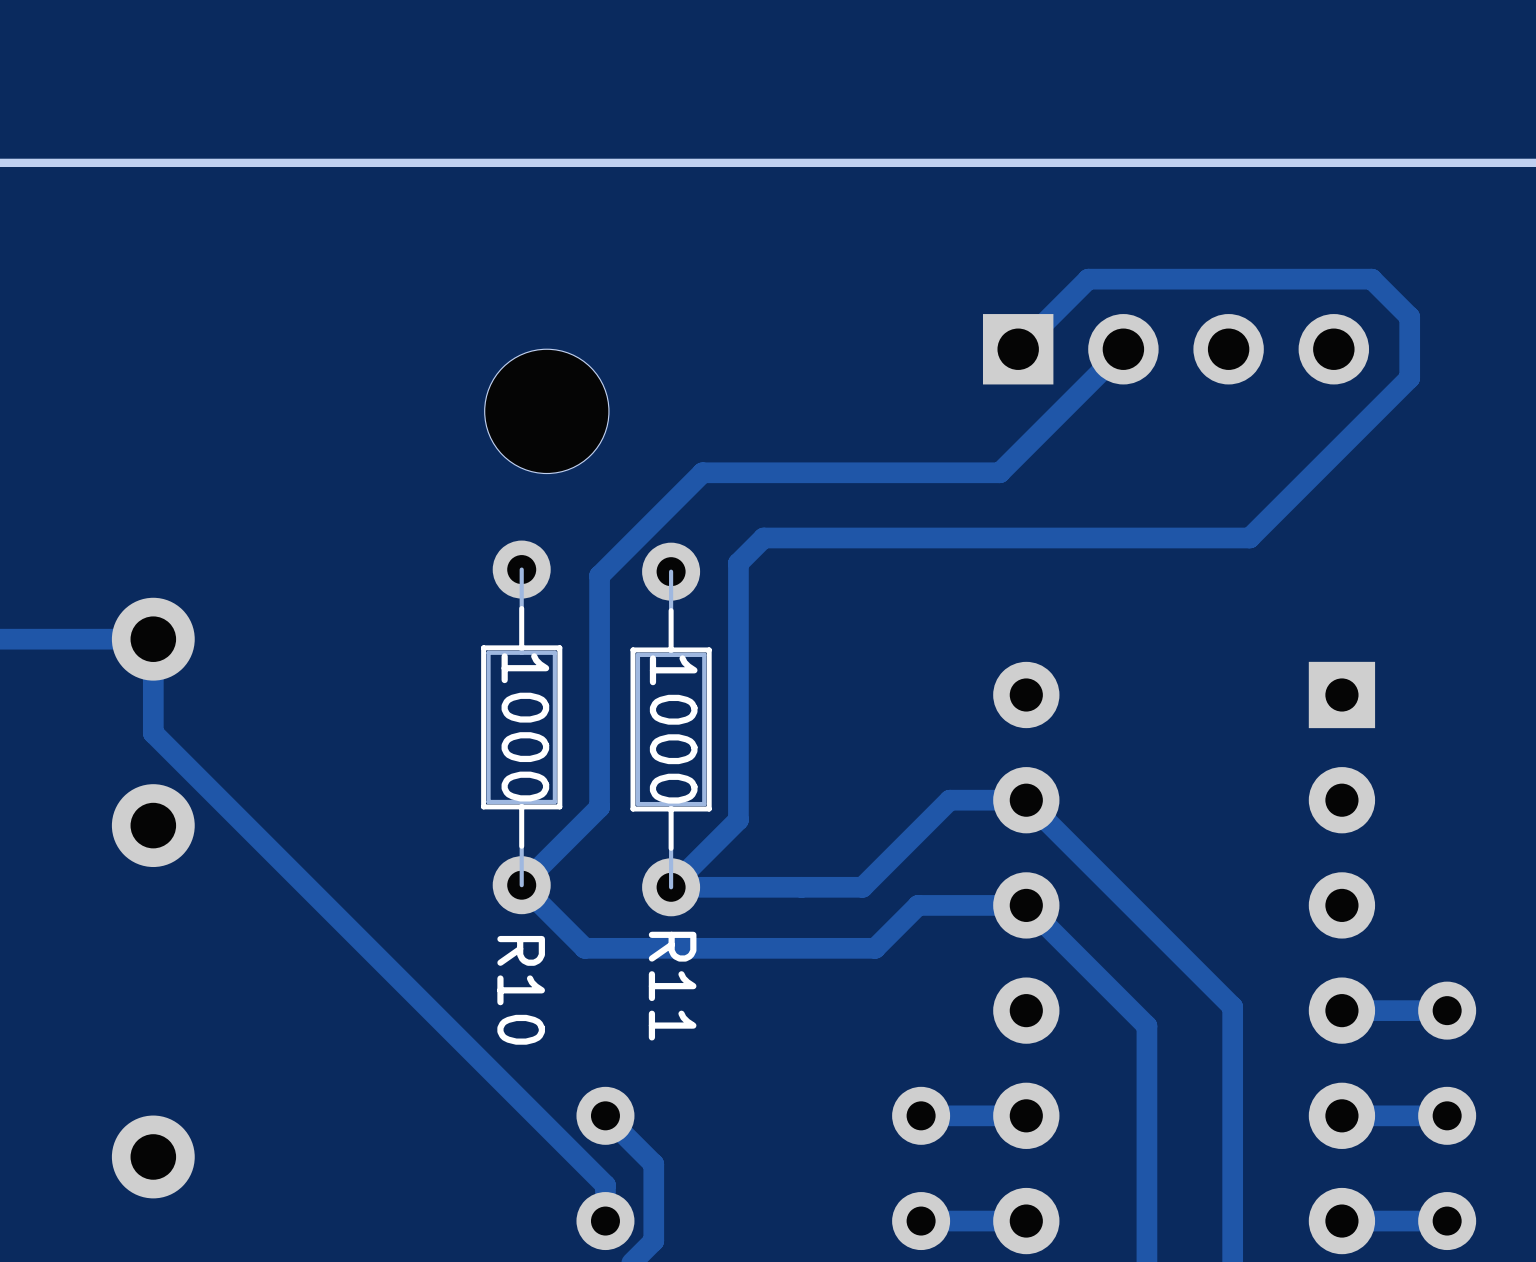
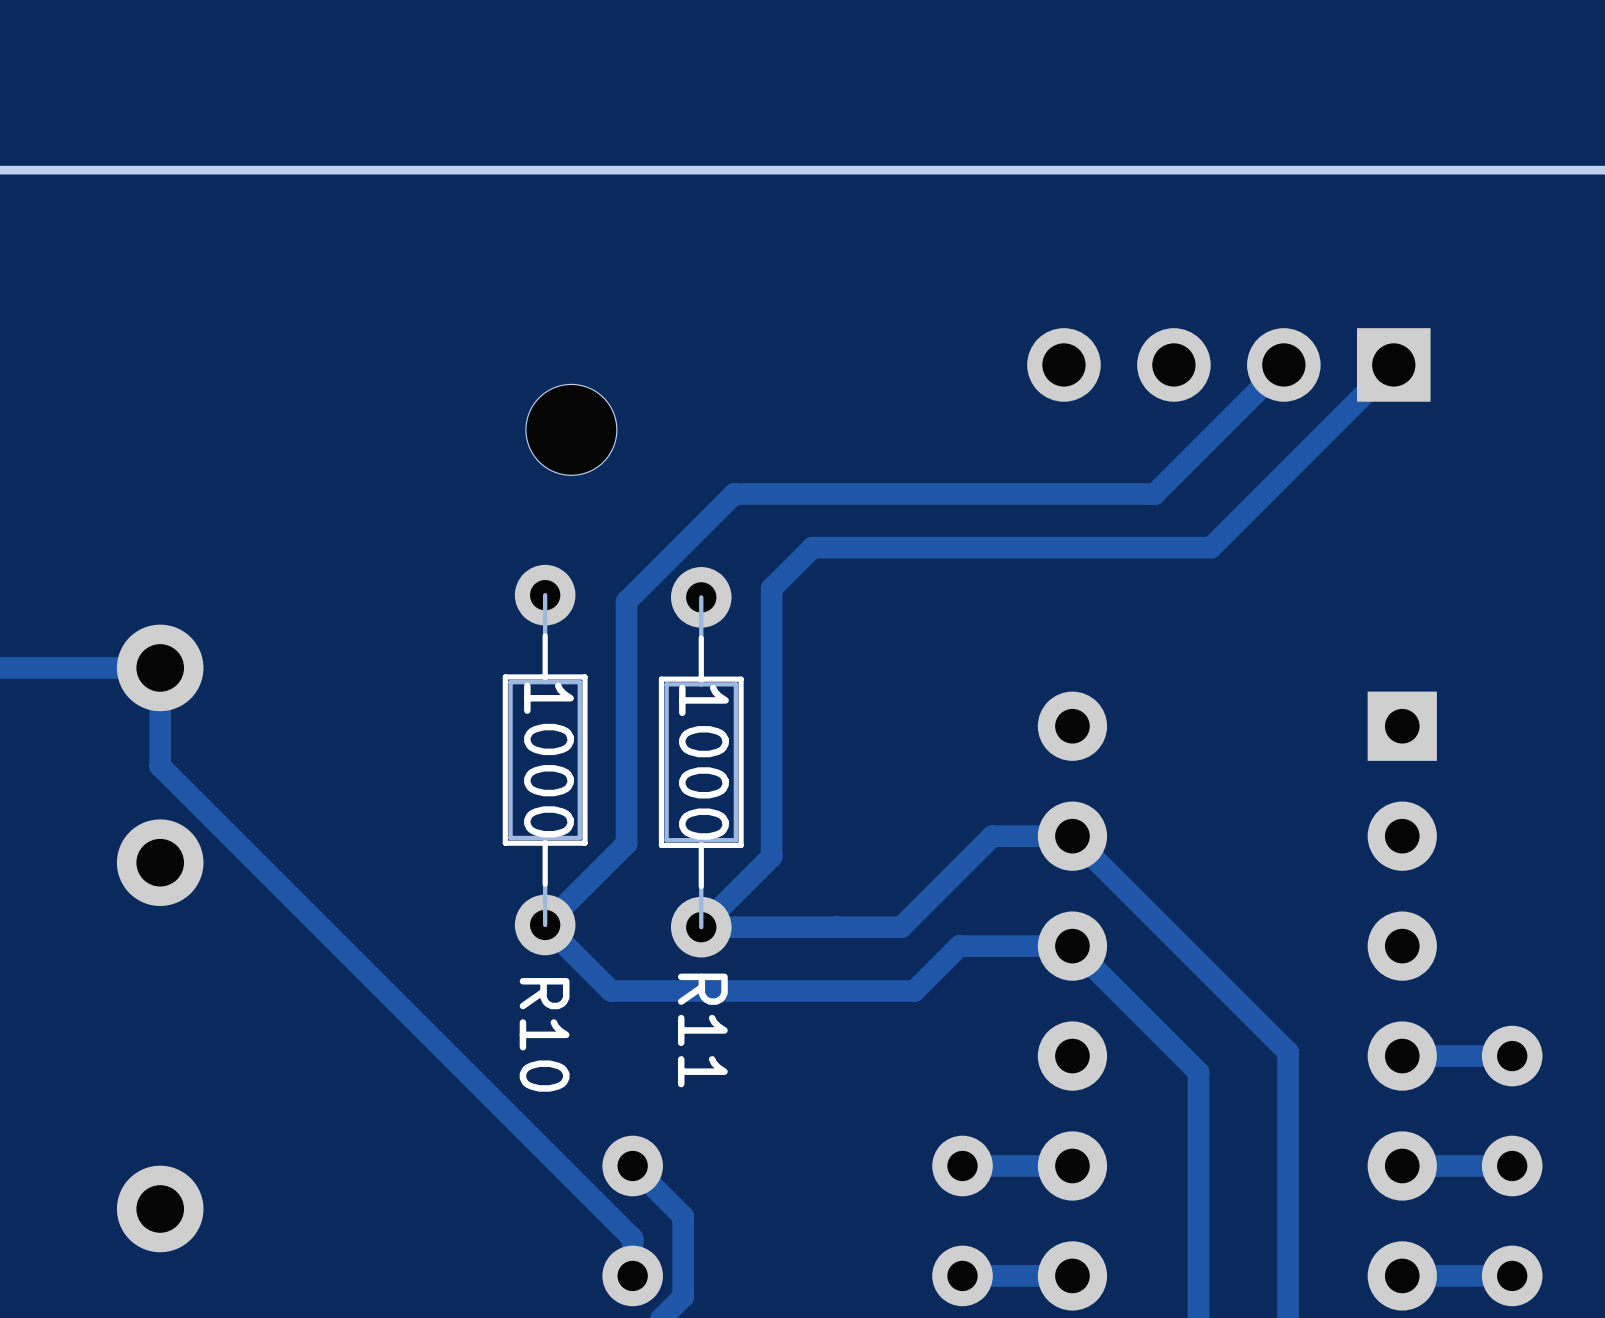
part footprint: [484, 349, 609, 474] -> [525, 384, 617, 476]
track: (1018, 349) (1088, 279) (1371, 279) (1409, 317) (1409, 378) (1249, 537) (763, 537) (738, 563) -> (1393, 364) (1211, 547) (812, 547) (771, 588)
track: (1123, 349) (999, 472) -> (1283, 364) (1154, 494) (1044, 494)
part rotation: 0° (1176, 349) -> 180° (1228, 364)

